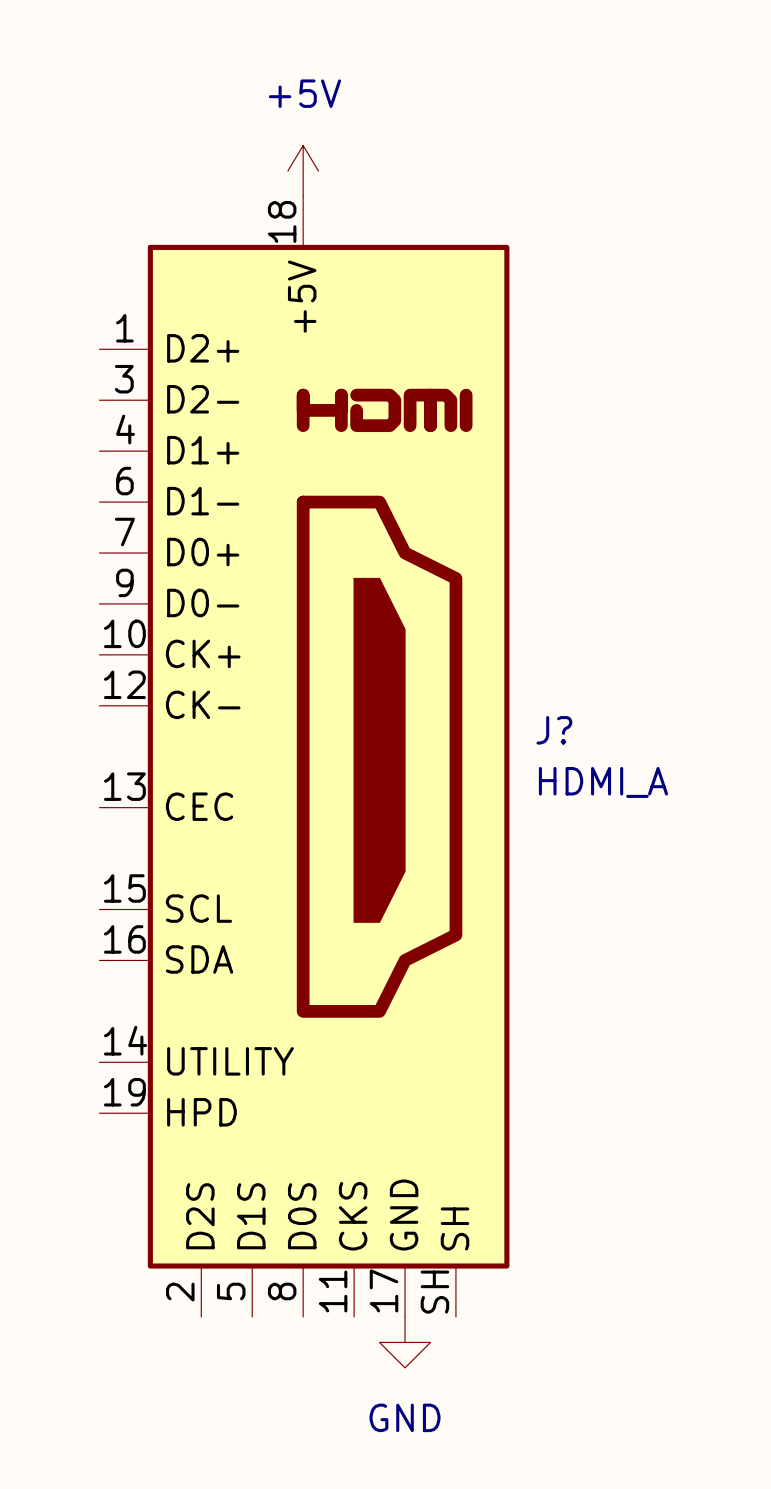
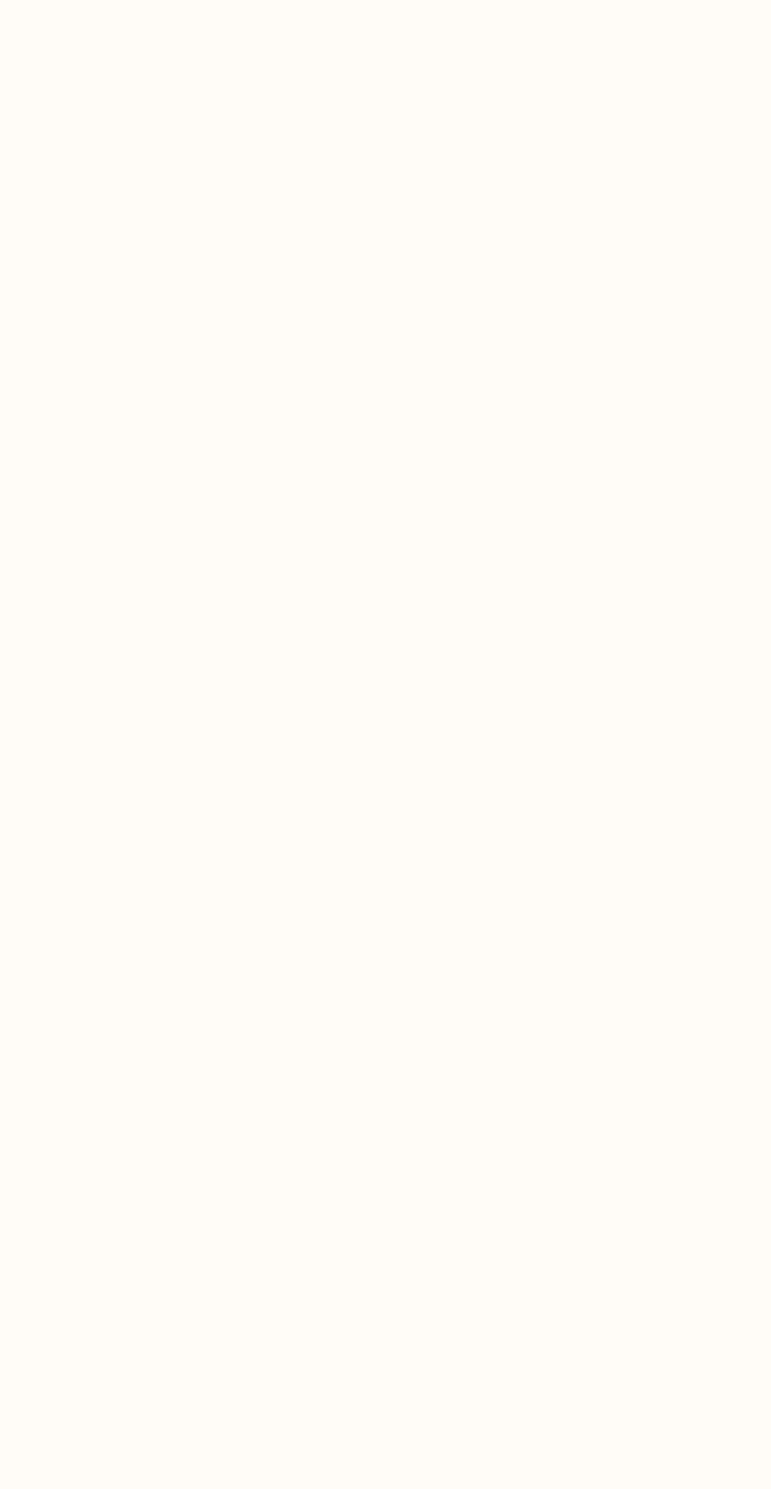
power symbol: +5V (303, 171) -> none
J?: HDMI_A (304, 756) -> none
power symbol: GND (405, 1342) -> none

